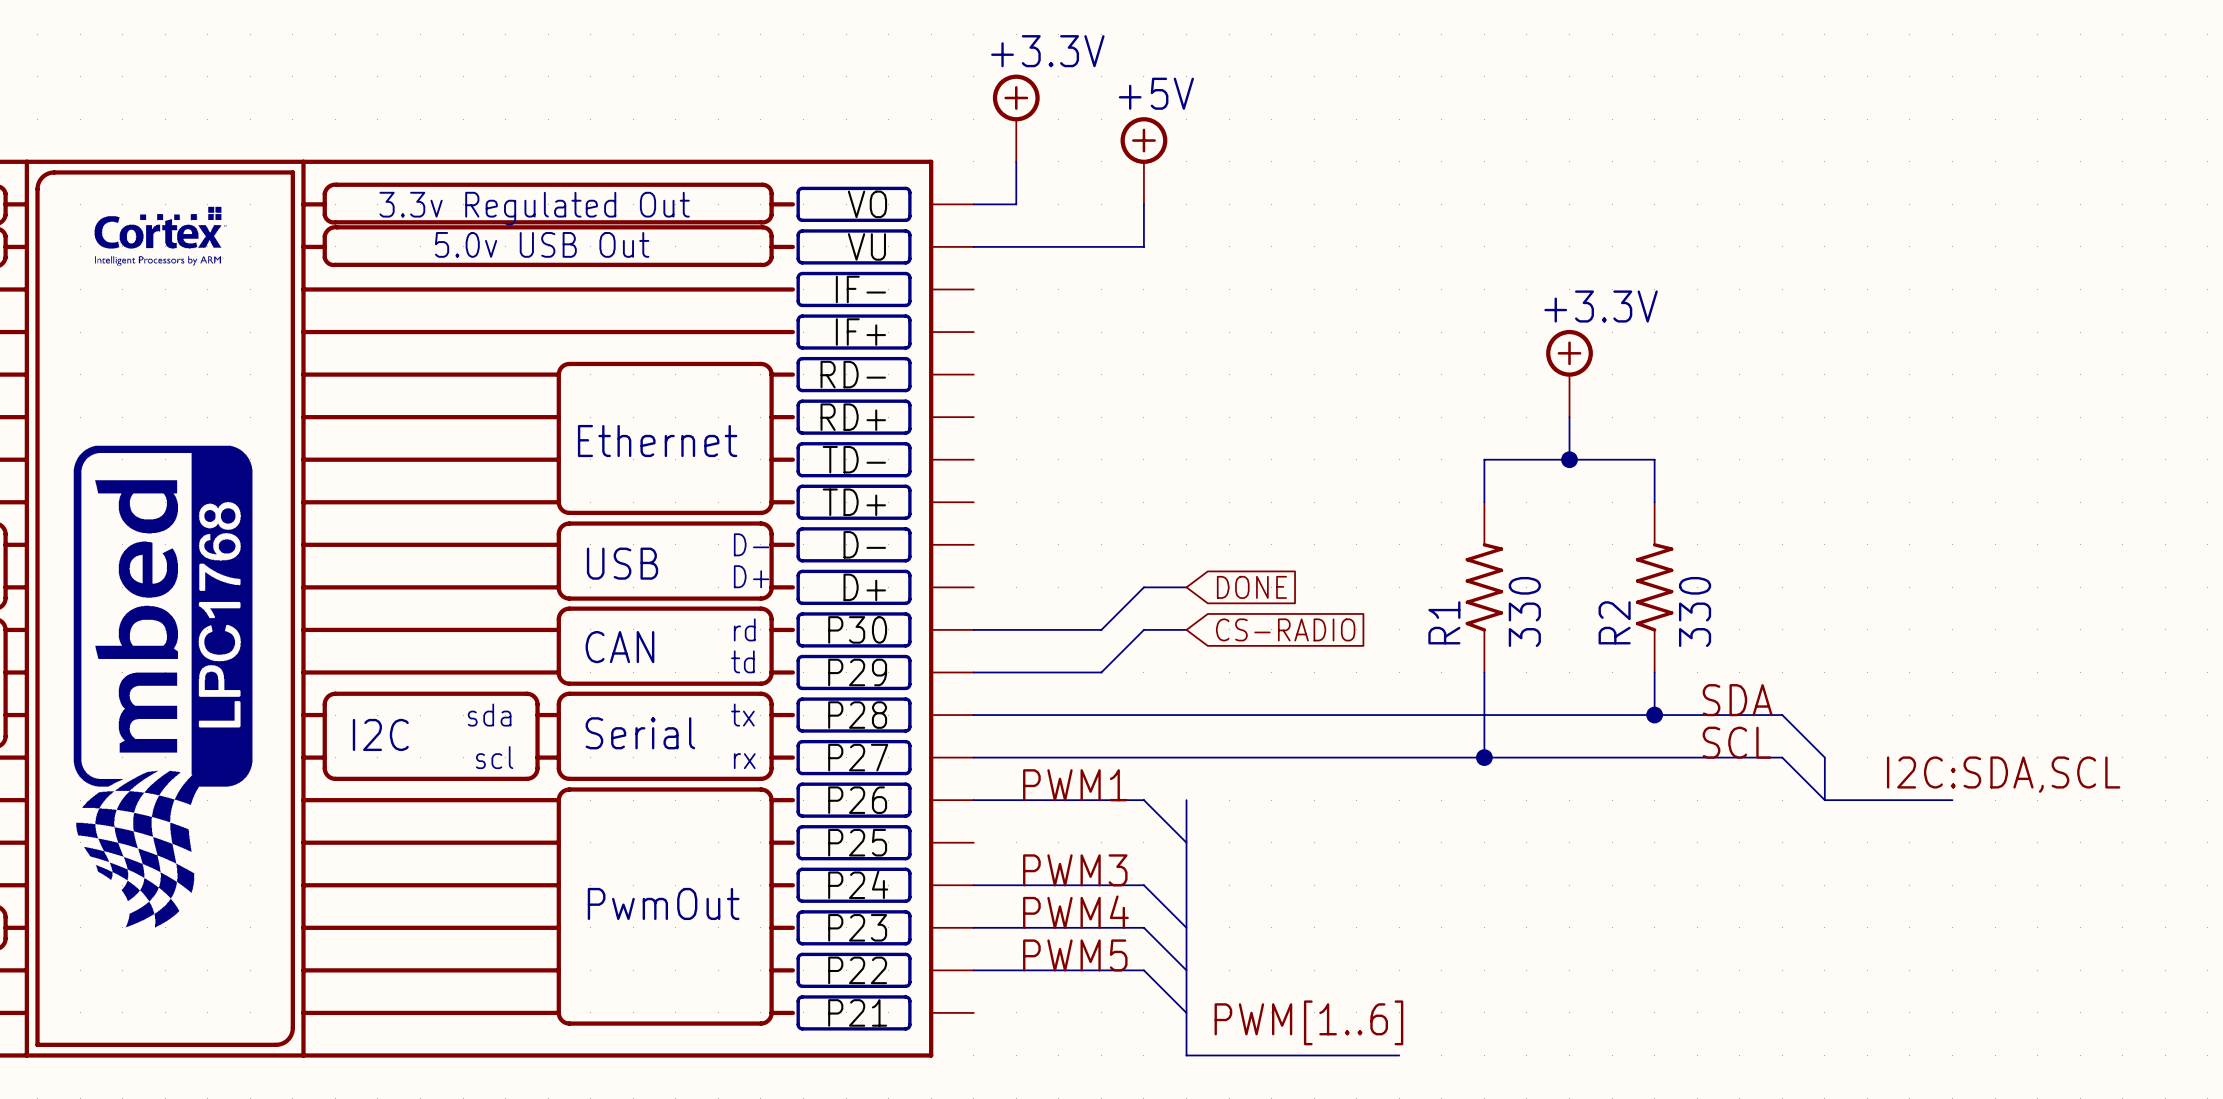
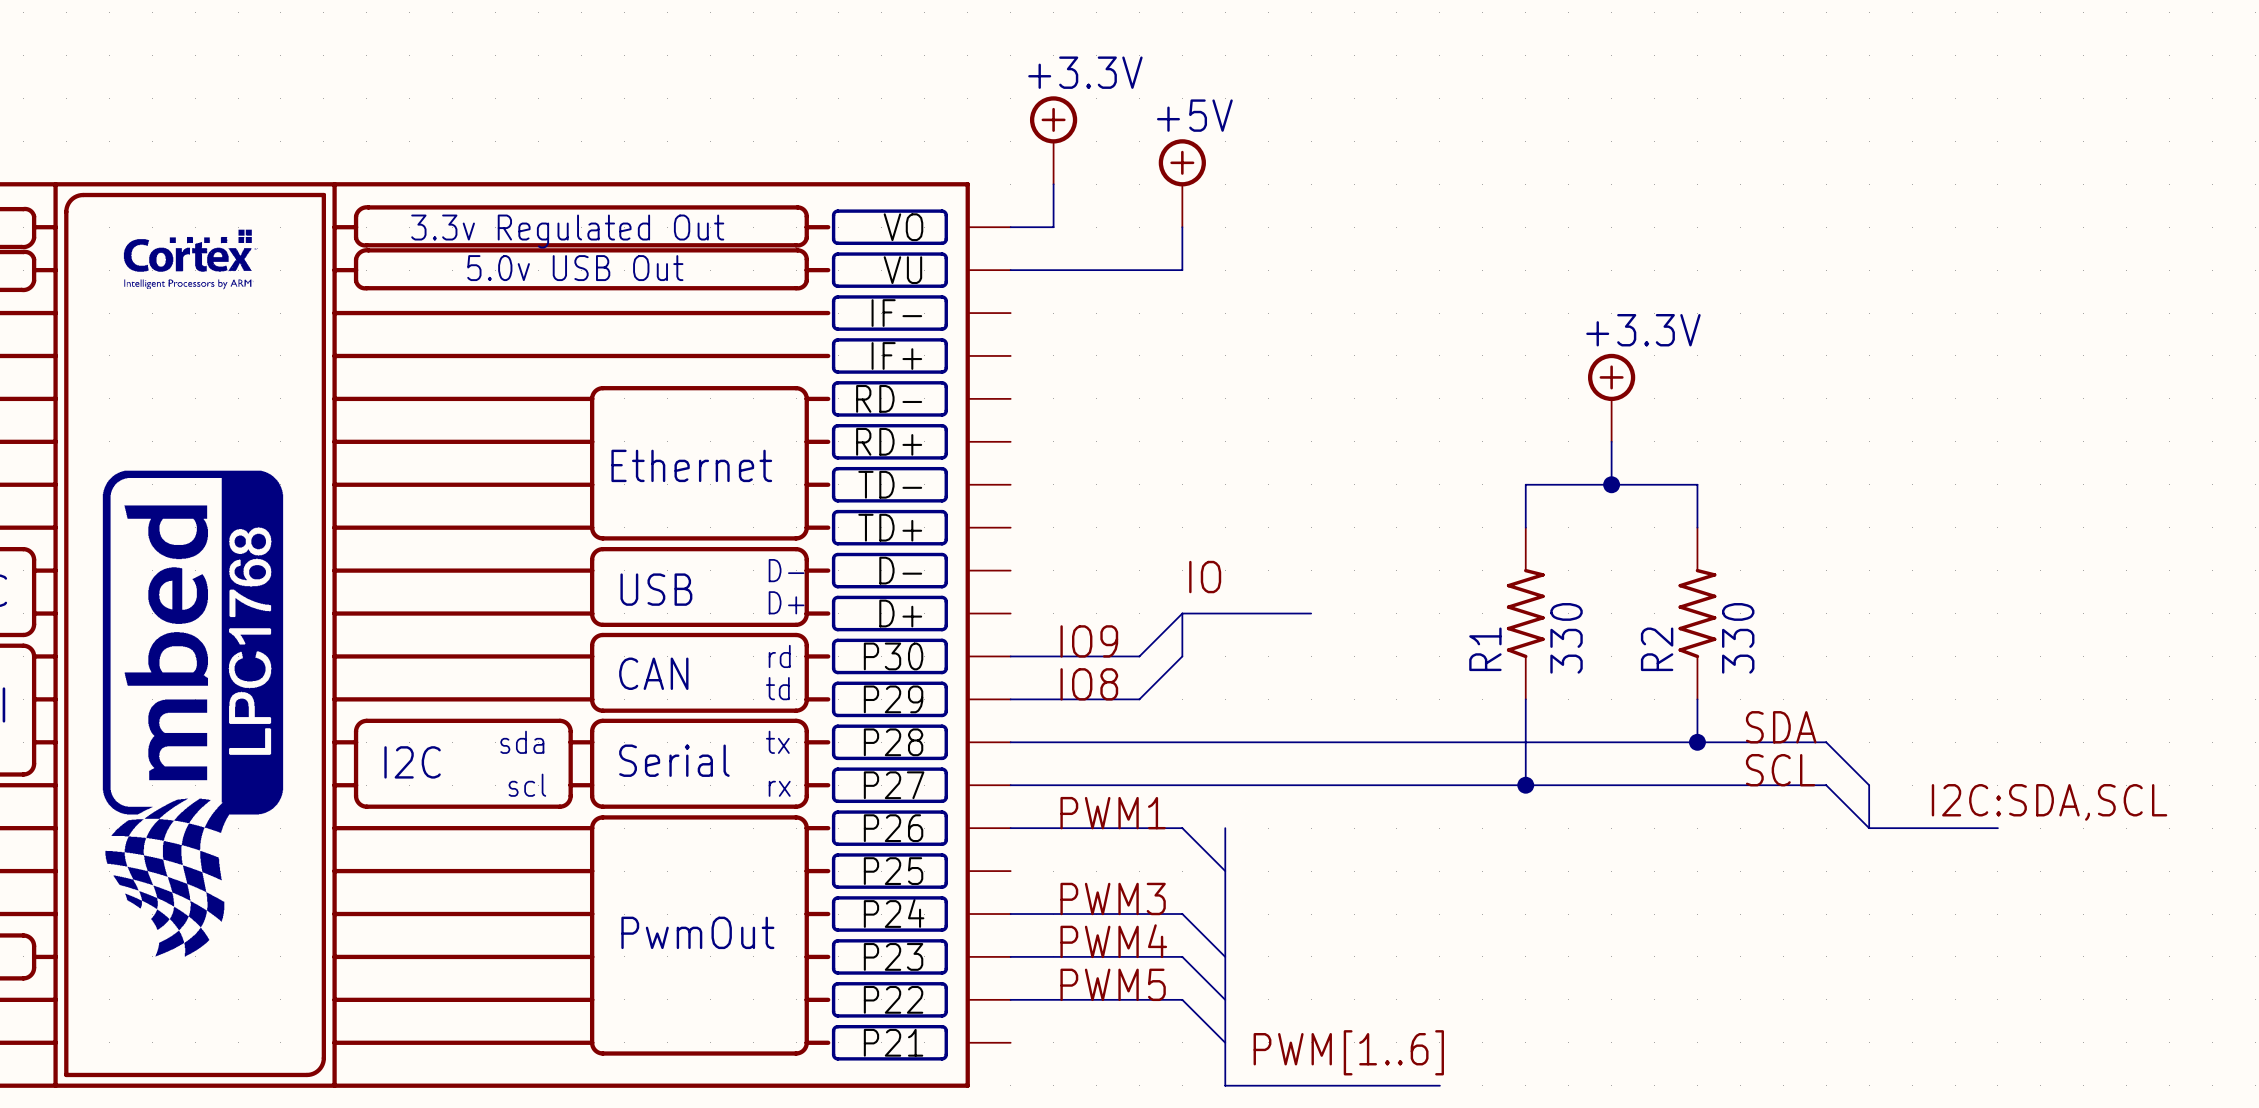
label: none -> IO (1205, 577)
global label: DONE (1251, 587) -> none
bus: none -> (1311, 613) (1182, 613) (1182, 656)
label: none -> IO9 (1089, 641)
wire: (1143, 629) (1186, 629) -> none
global label: CS-RADIO (1285, 629) -> none
label: none -> IO8 (1089, 684)

